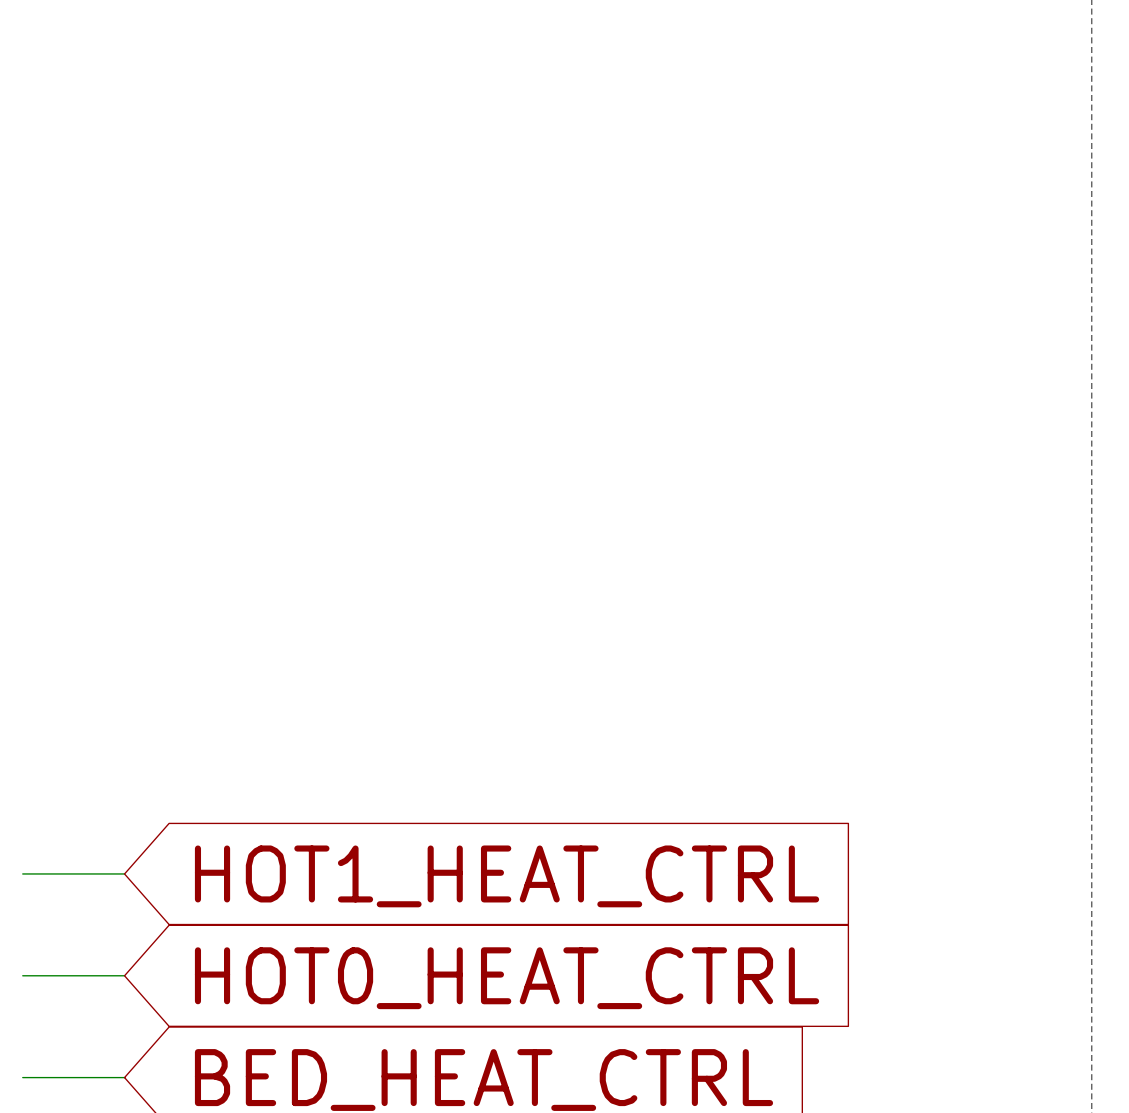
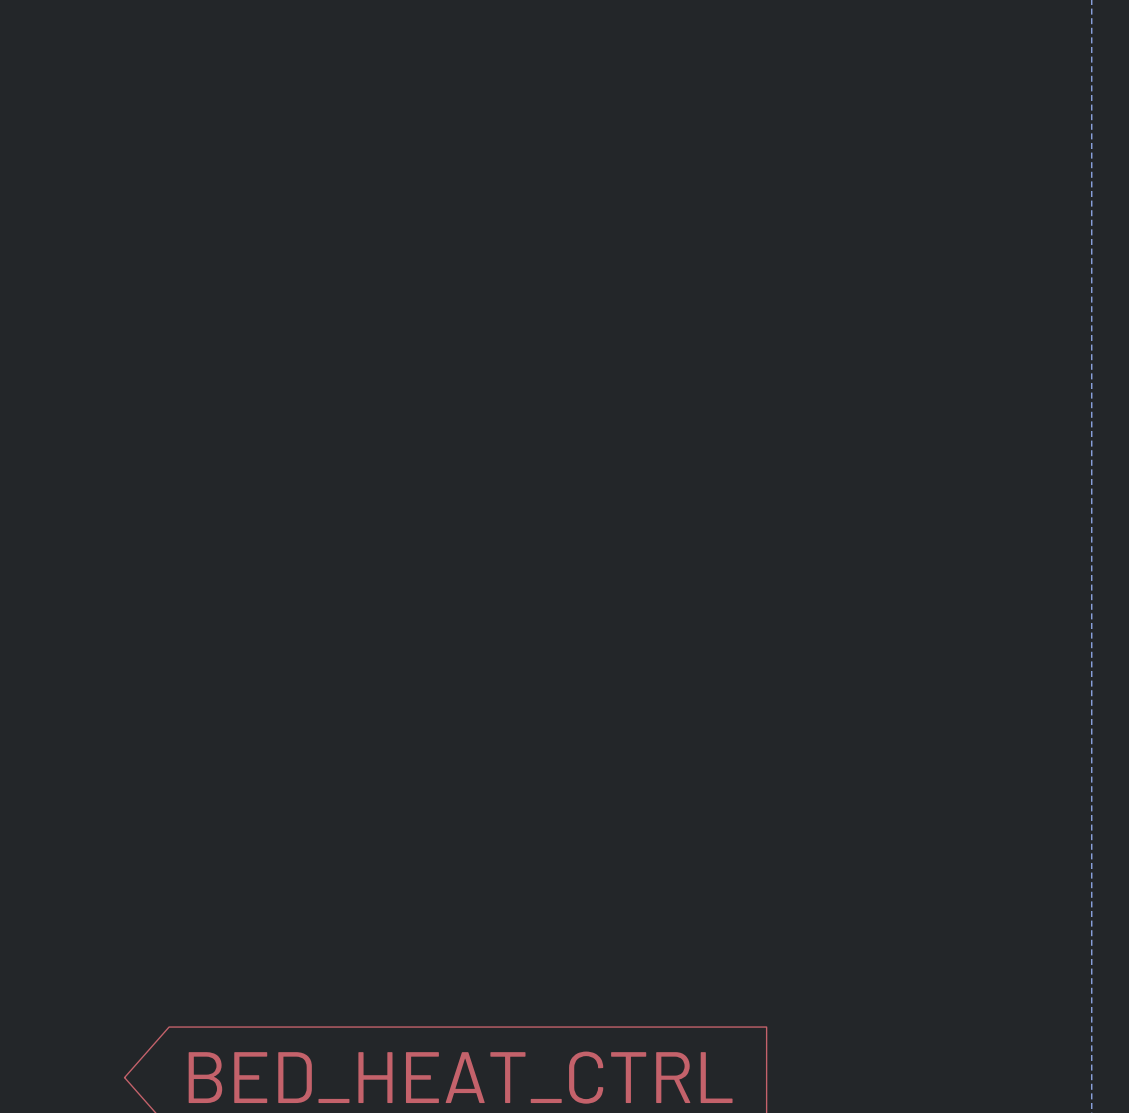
wire: (22, 873) (124, 873) -> none
global label: HOT1_HEAT_CTRL (507, 876) -> none
wire: (22, 975) (124, 975) -> none
global label: HOT0_HEAT_CTRL (507, 978) -> none
wire: (22, 1077) (124, 1077) -> none

